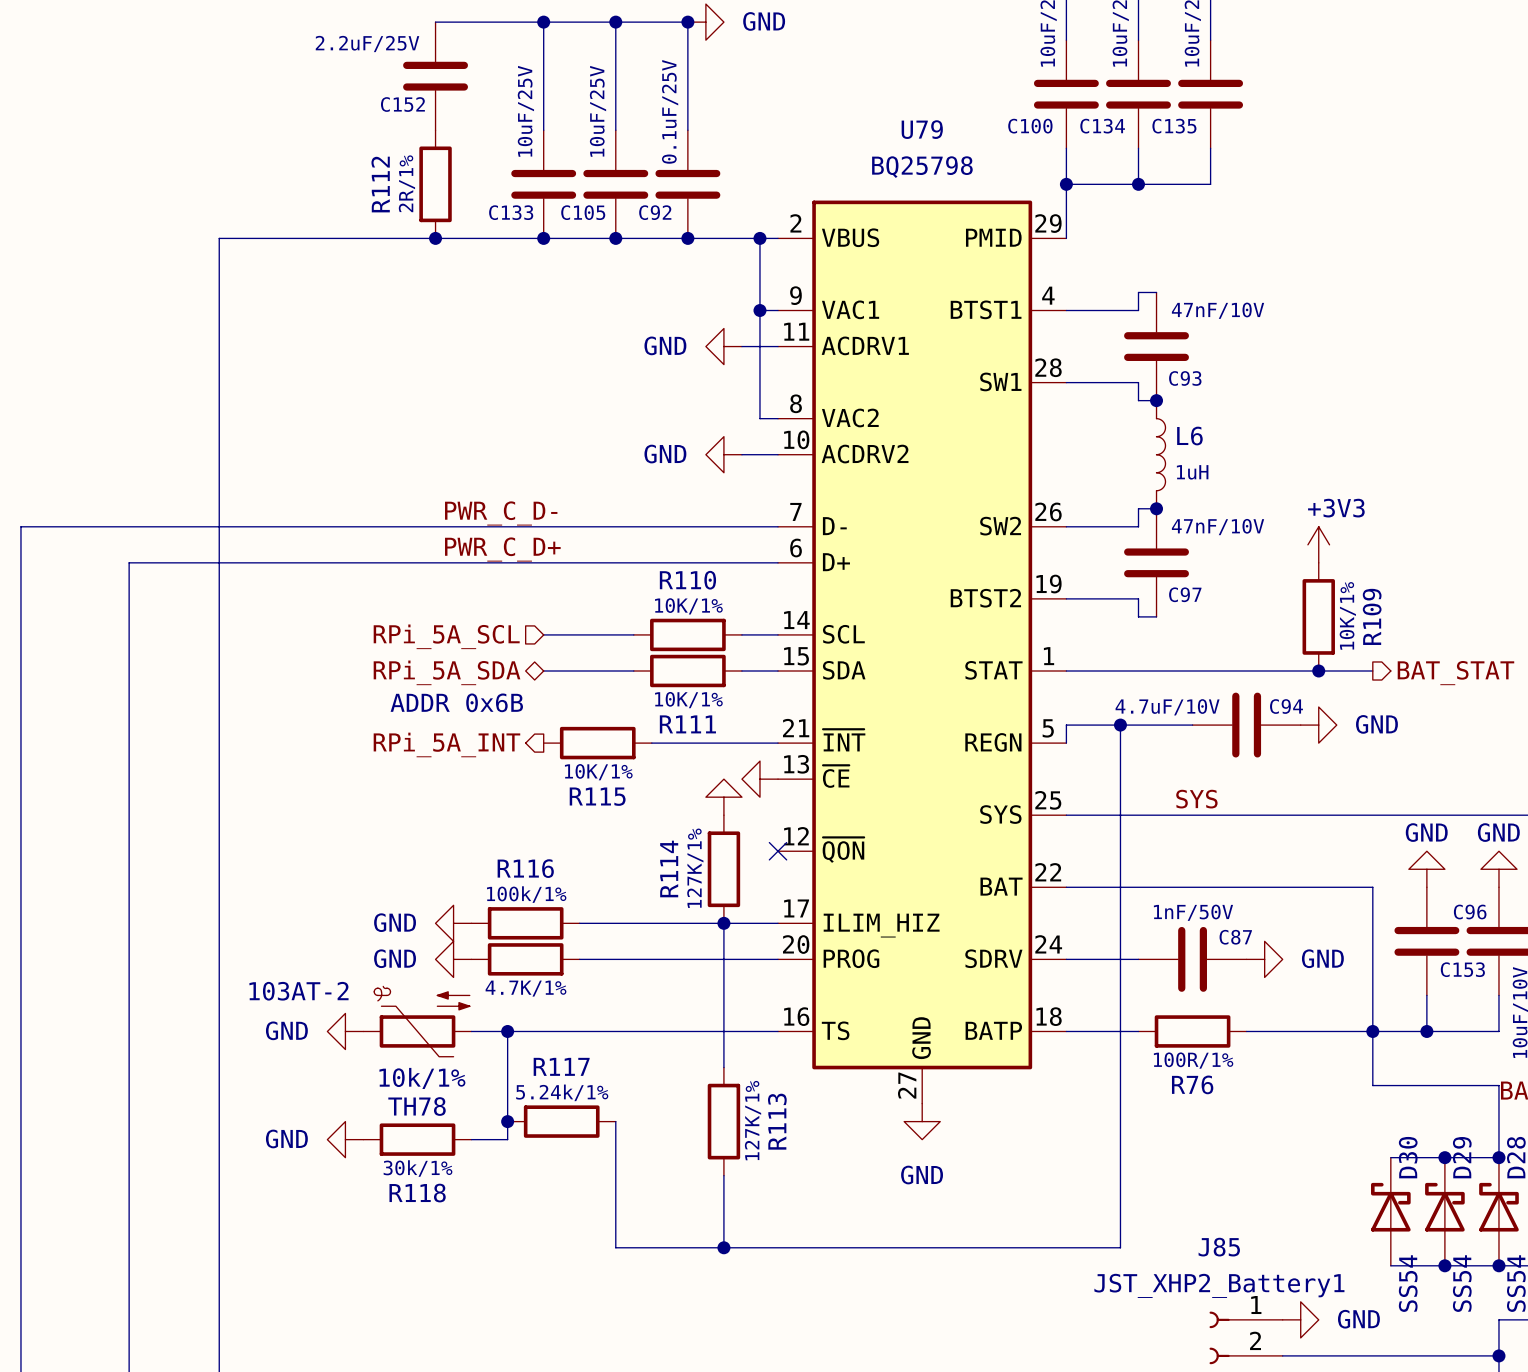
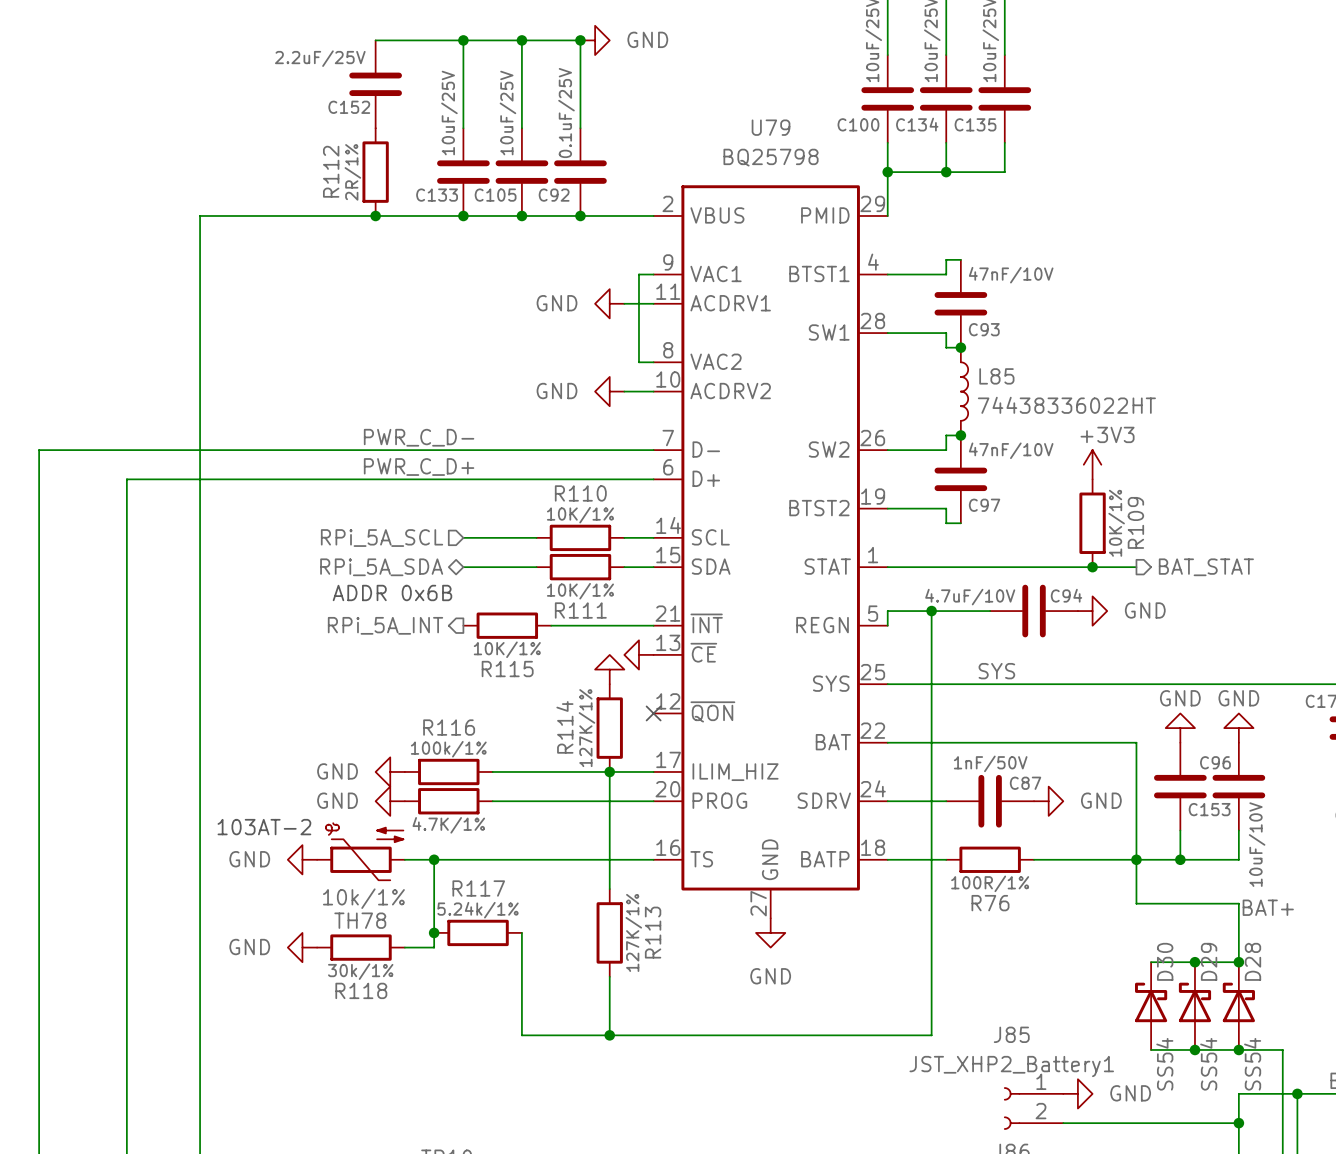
wire: (759, 238) (759, 310) -> none
junction: (759, 238) -> none
junction: (759, 310) -> none
L6 name: L6 (1189, 436) -> L85 (996, 376)
L6 value: 1uH (1192, 472) -> 74438336022HT (1066, 405)

